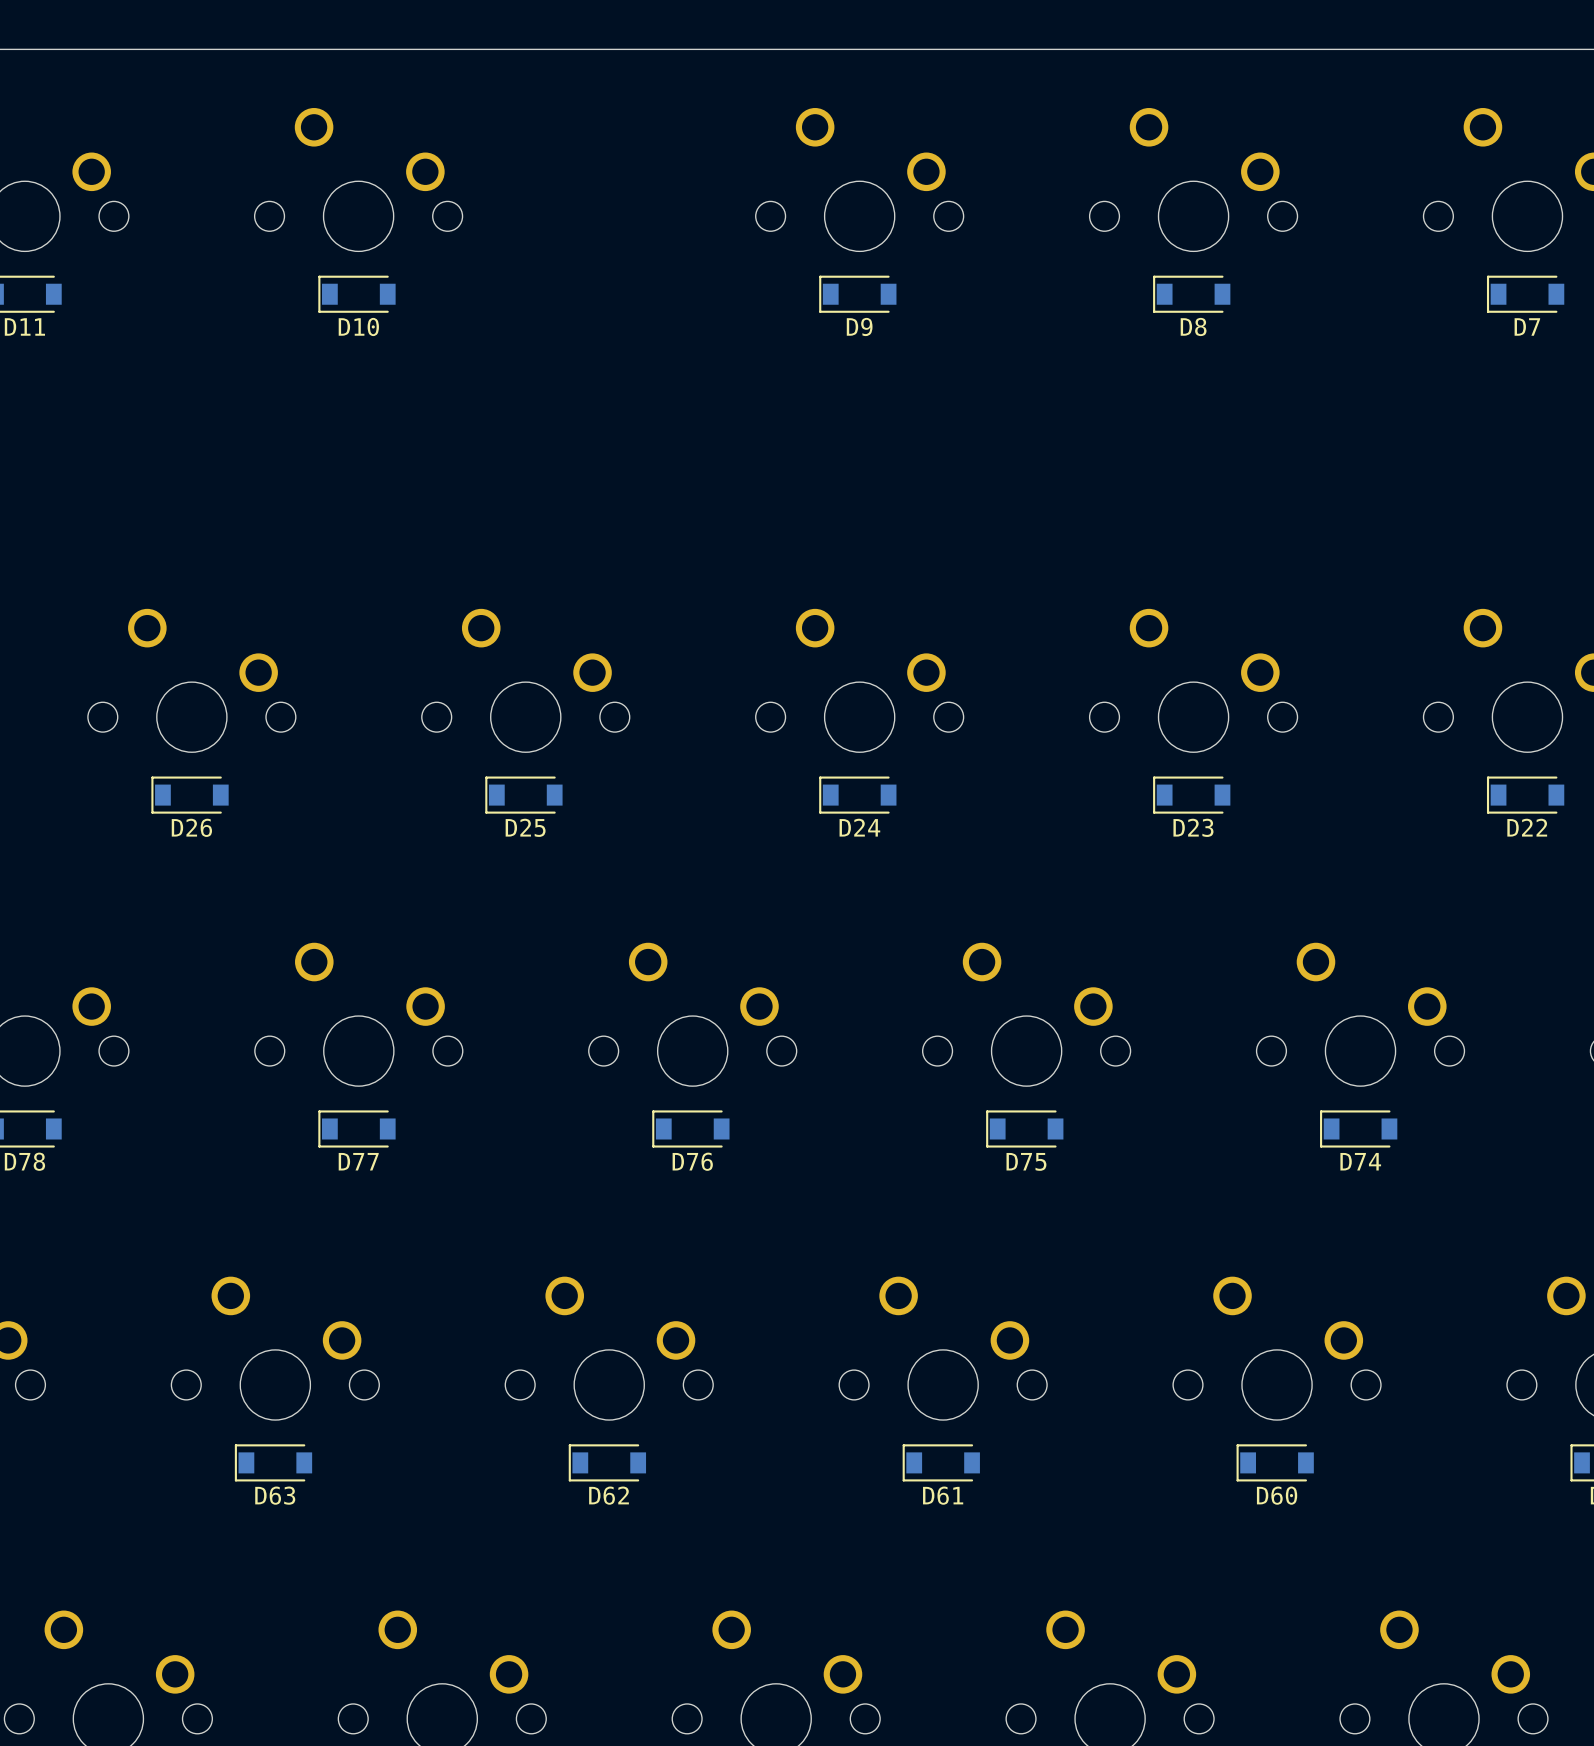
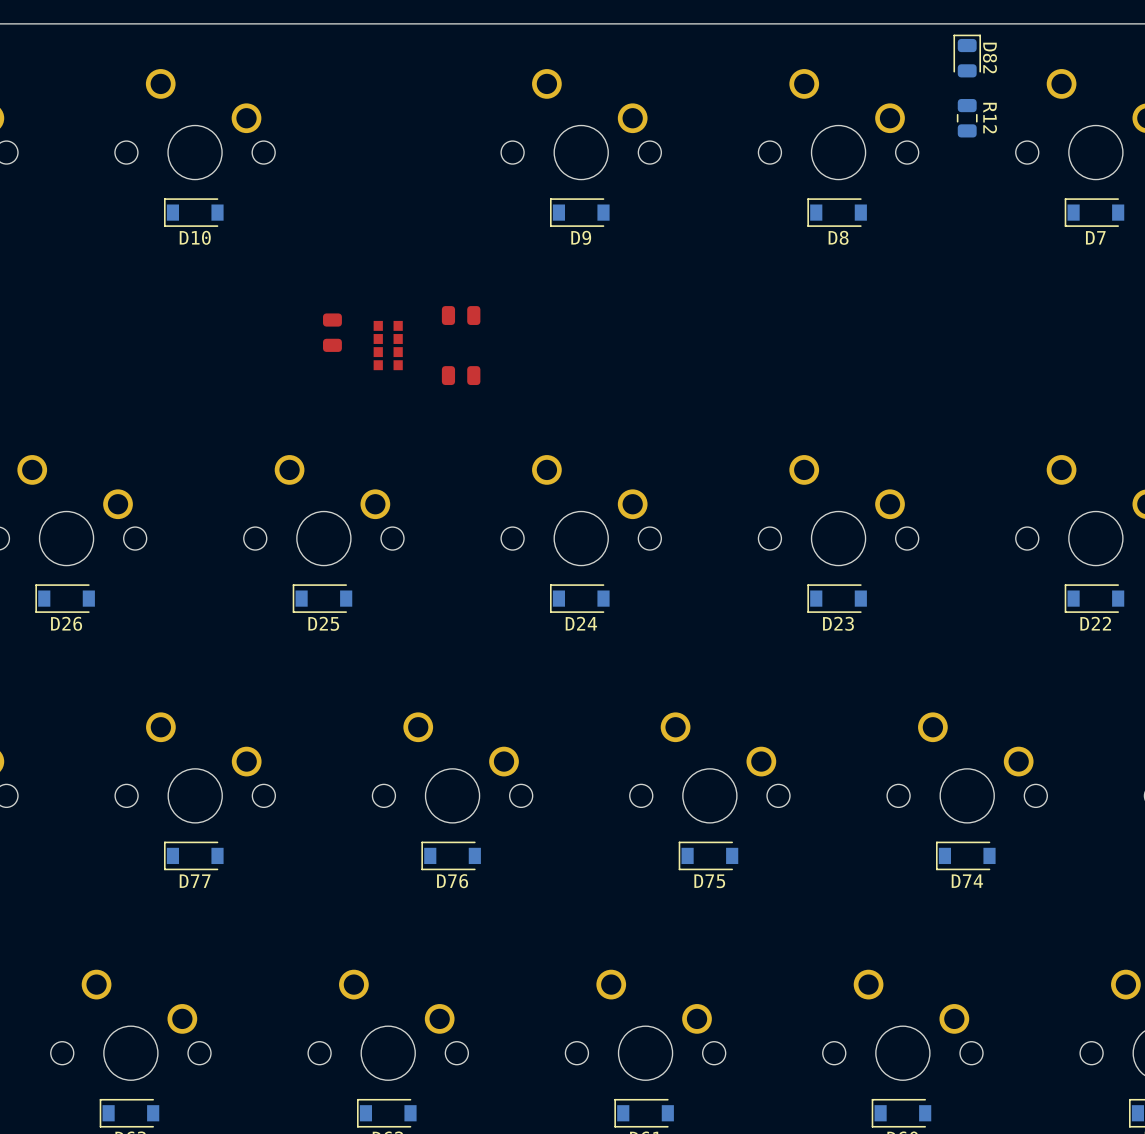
D82: none -> (967, 56)
R12: none -> (967, 118)
part: none -> (461, 315)
part: none -> (332, 332)
part: none -> (388, 345)
part: none -> (461, 375)

